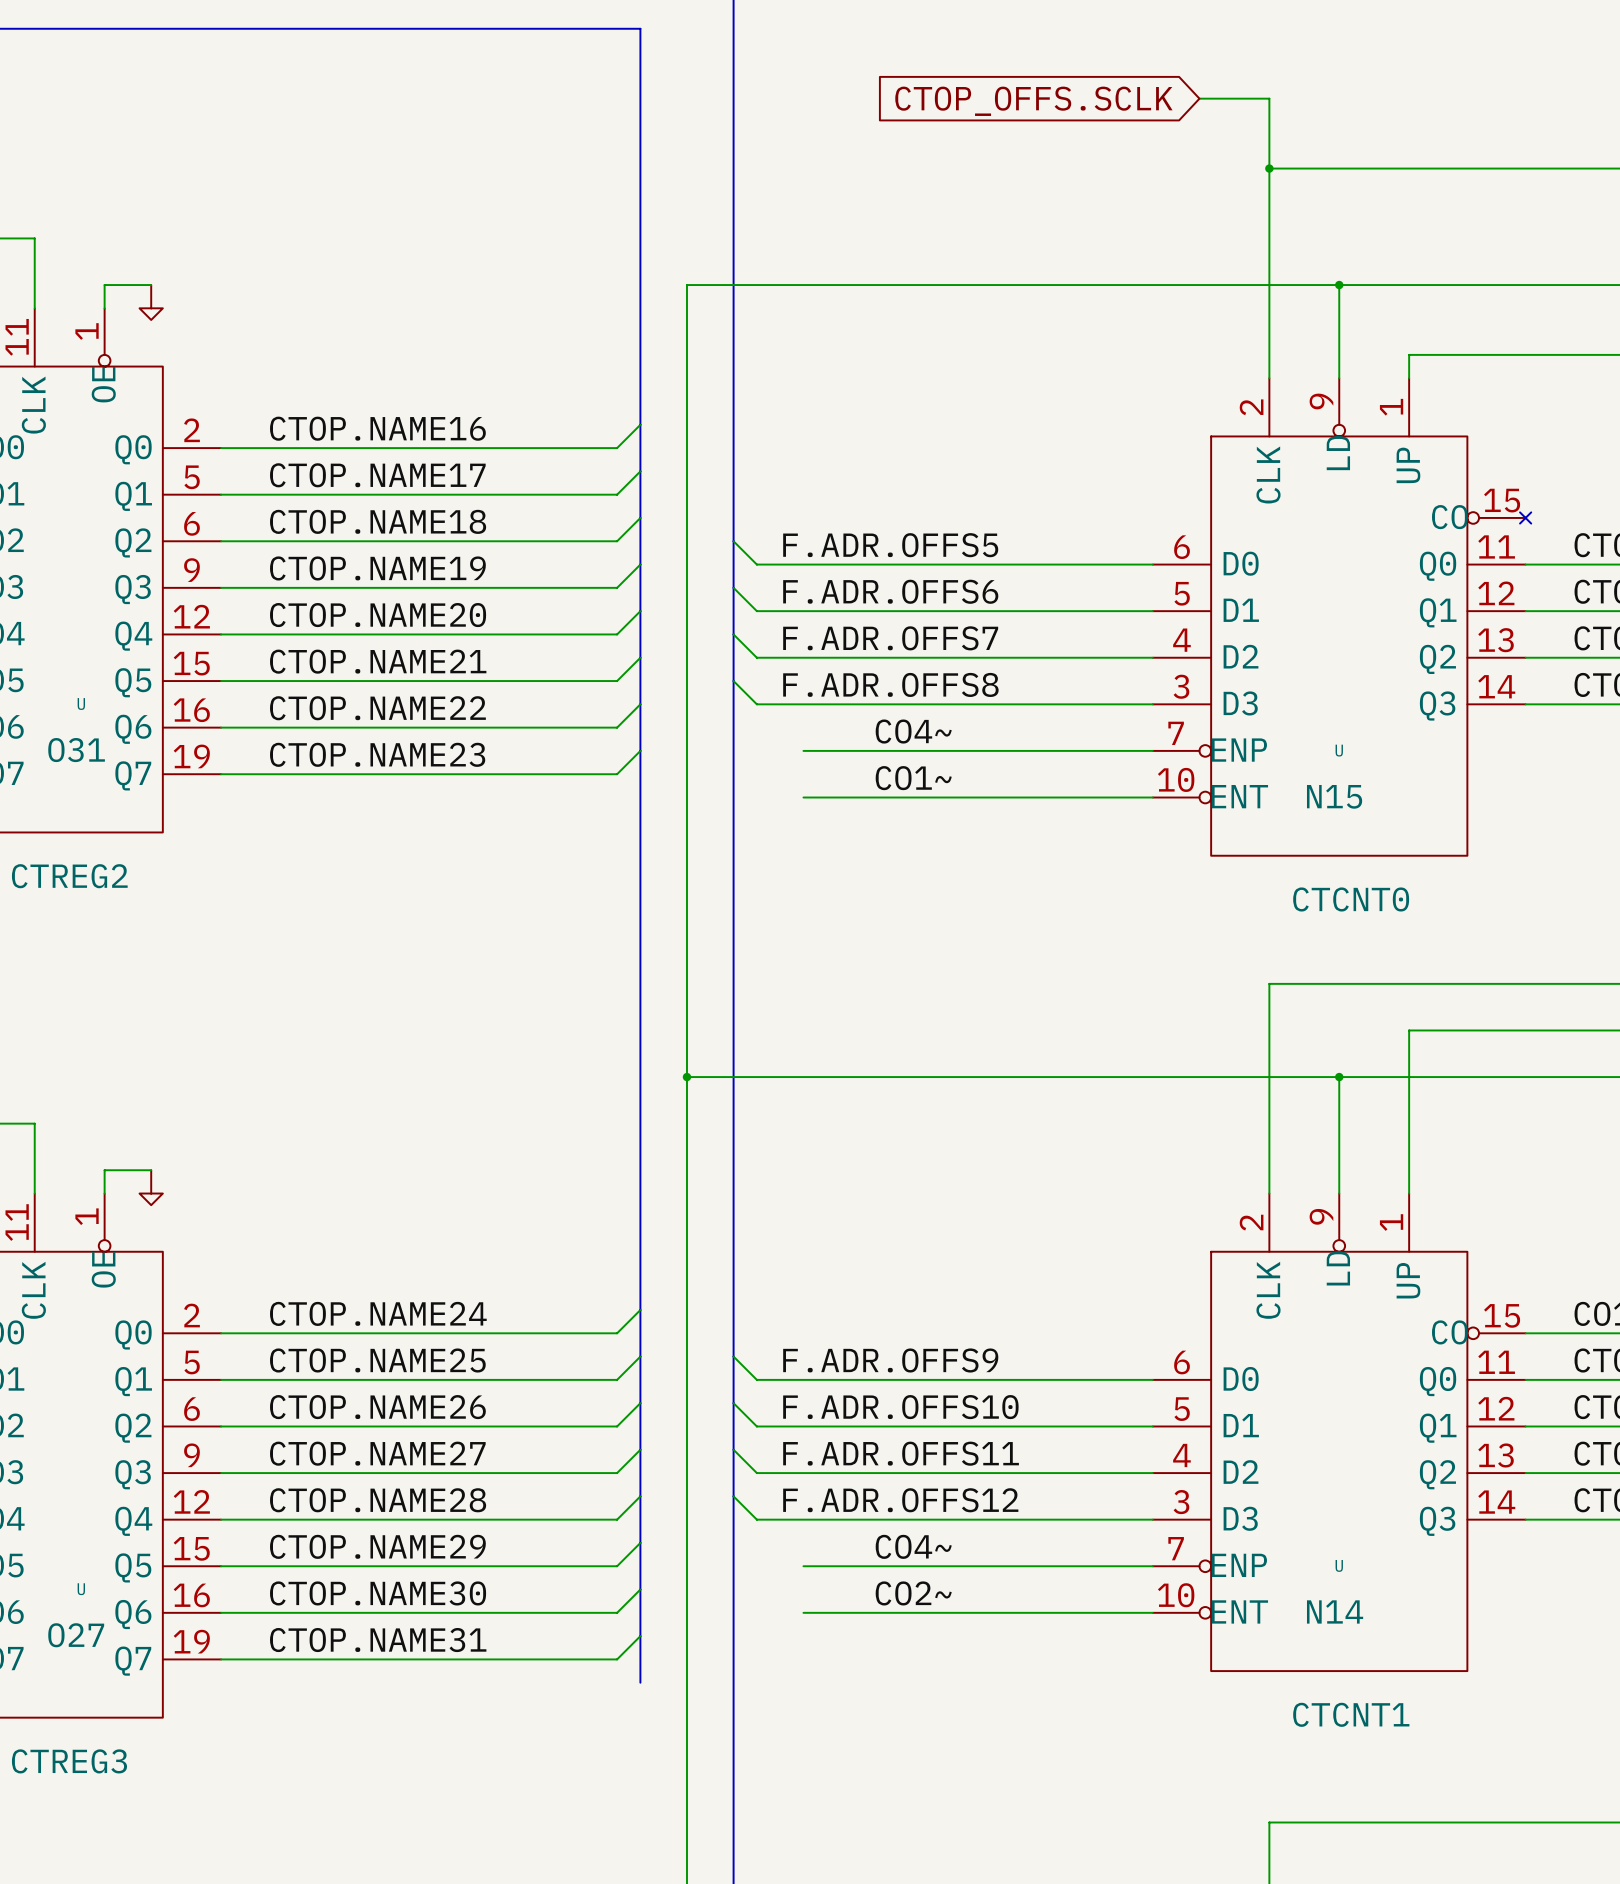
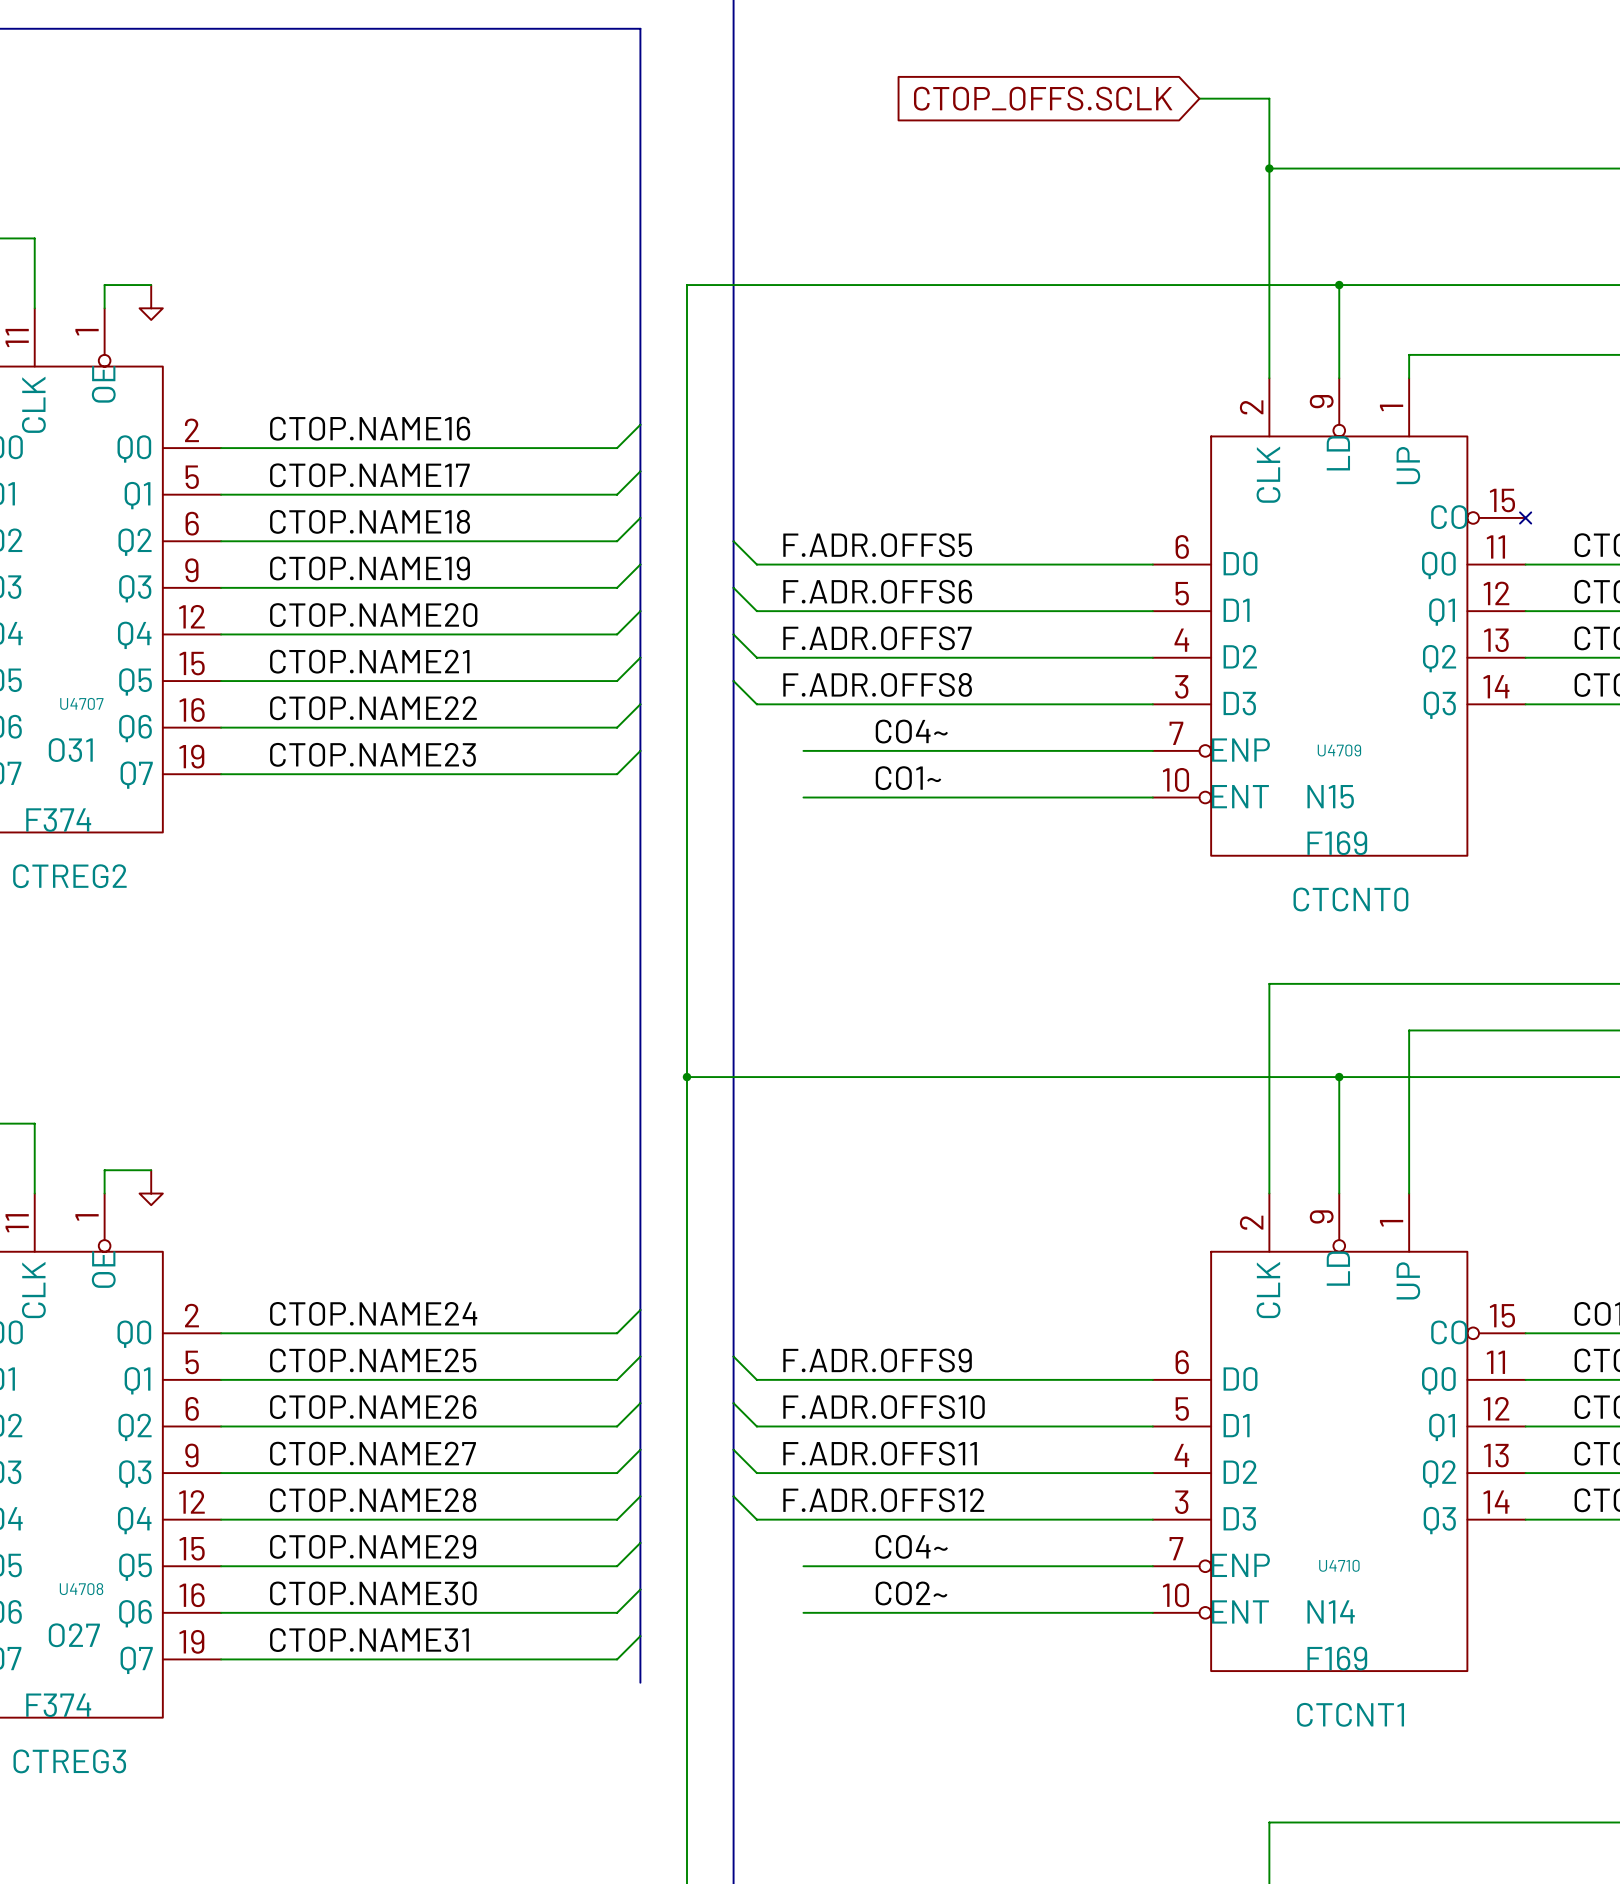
U name: U (81, 704) -> U4707 (81, 703)
U name: U (1339, 750) -> U4709 (1339, 750)
U value: none -> F374 (58, 820)
U value: none -> F169 (1337, 843)
U name: U (1339, 1565) -> U4710 (1339, 1565)
U name: U (81, 1589) -> U4708 (81, 1589)
U value: none -> F169 (1337, 1658)
U value: none -> F374 (58, 1705)

